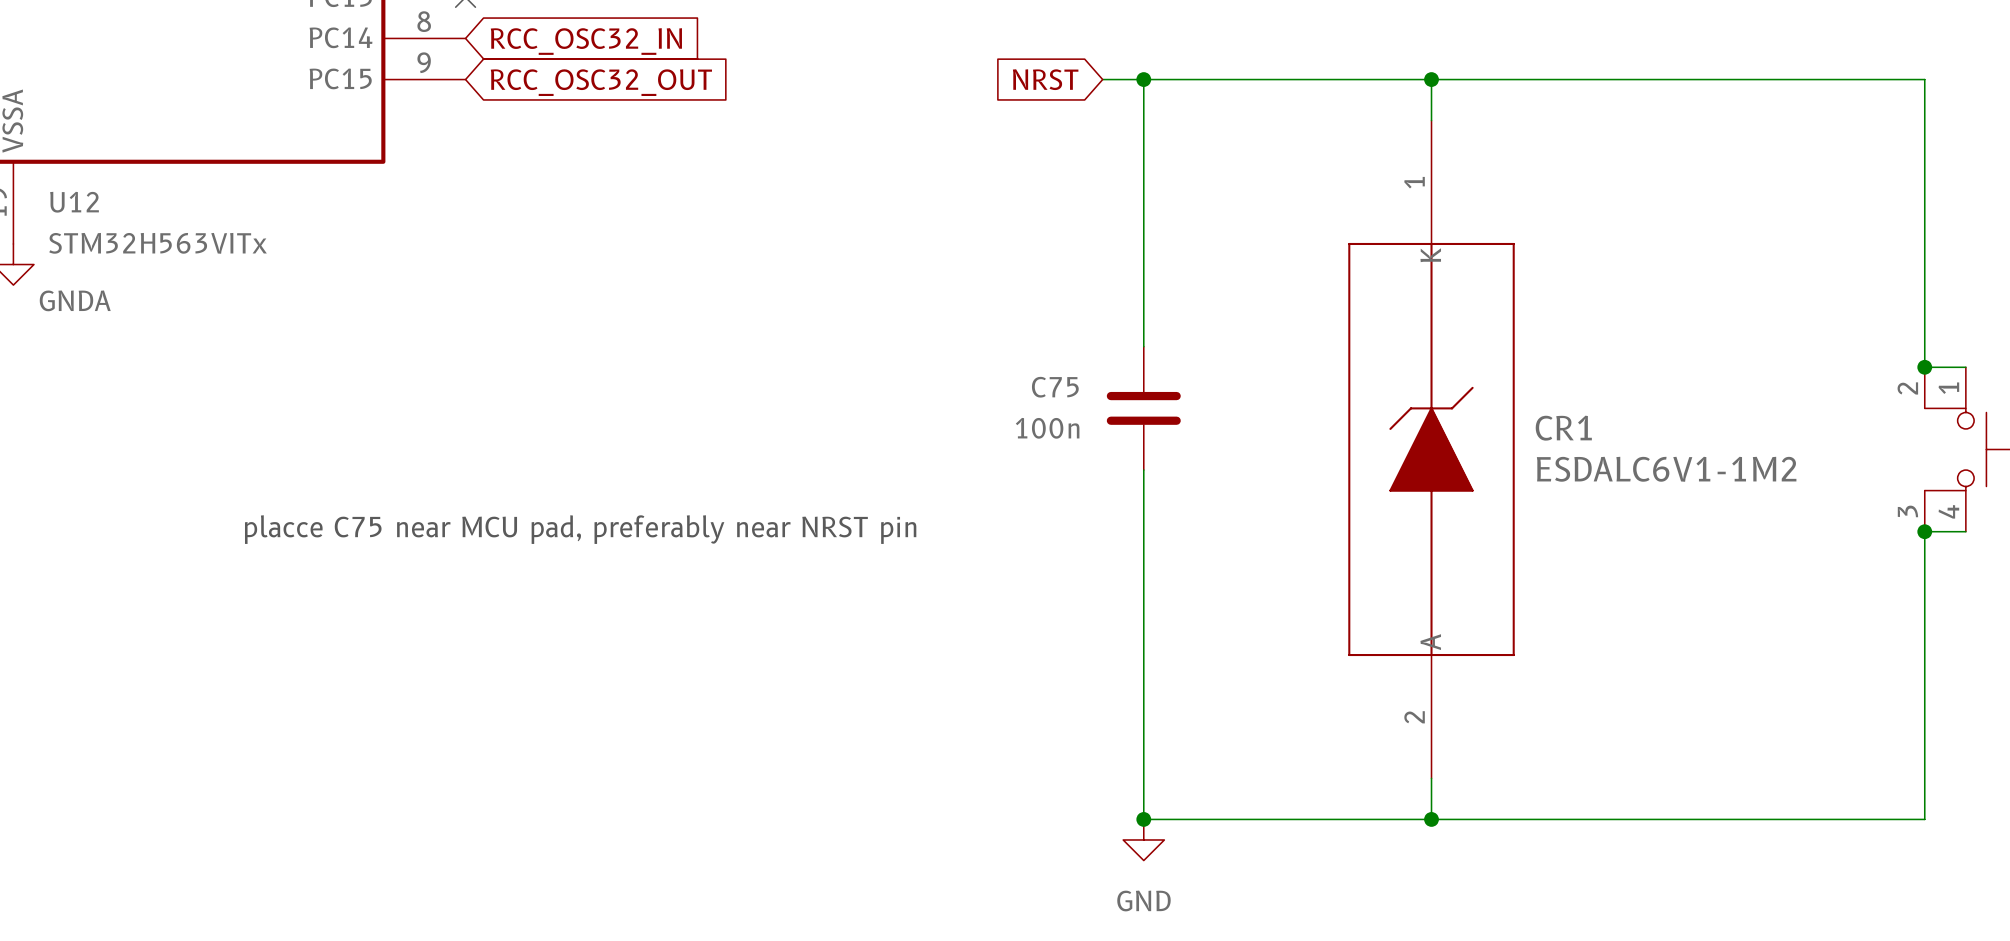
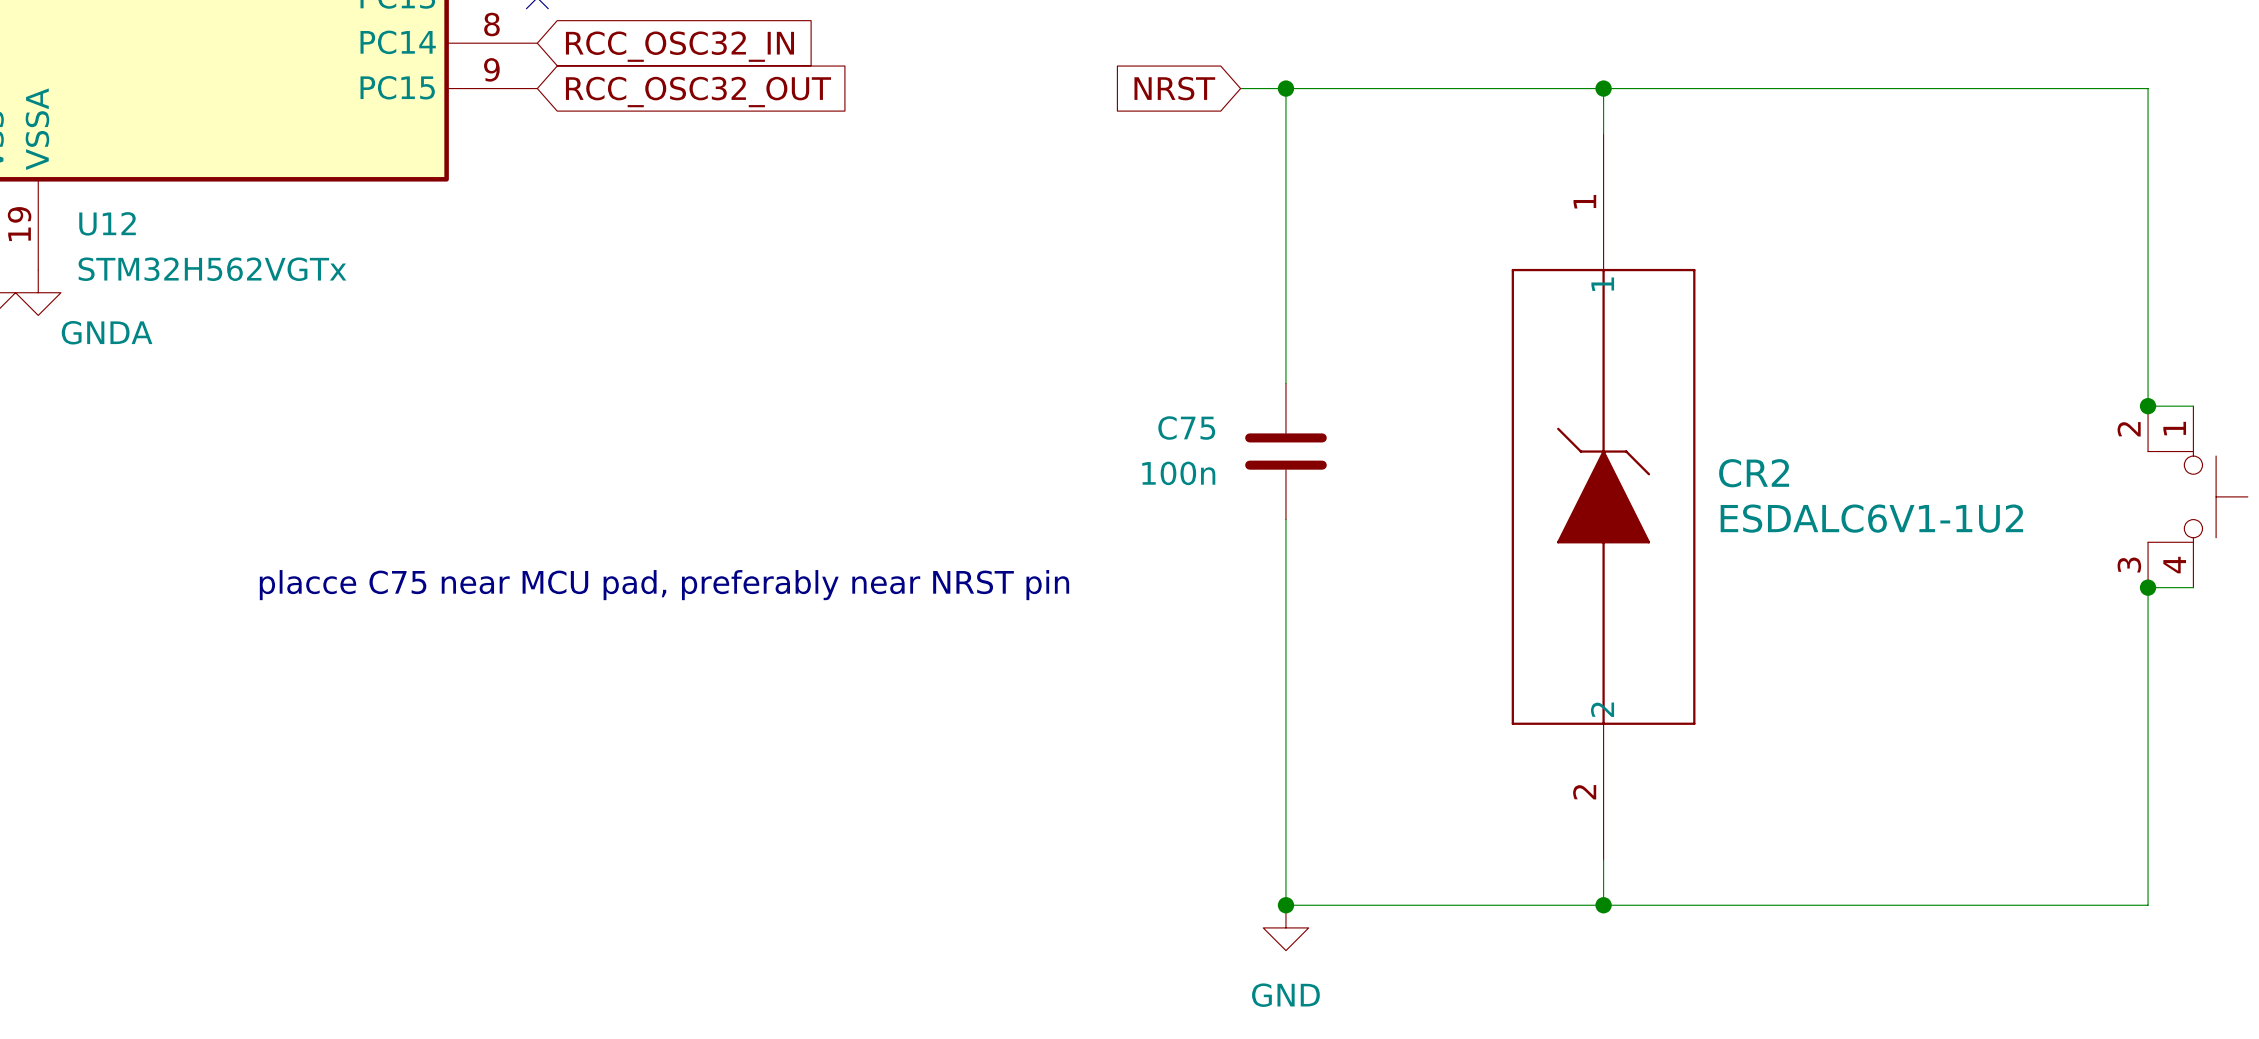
U12 value: STM32H563VITx (158, 243) -> STM32H562VGTx (212, 269)
CR1: ESDALC6V1-1M2 (1431, 449) -> none
CR2: none -> ESDALC6V1-1U2 (1603, 496)

